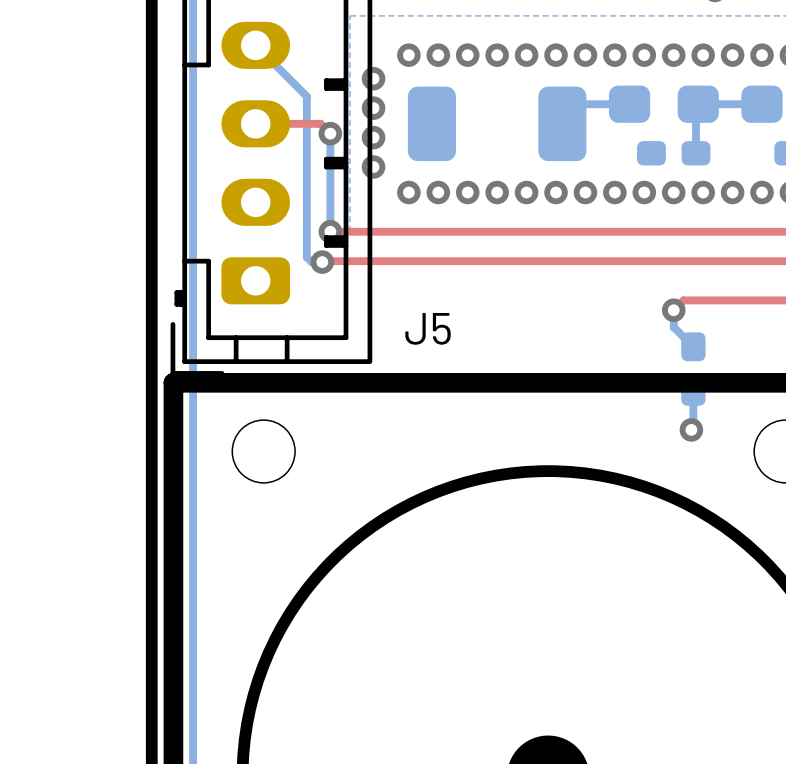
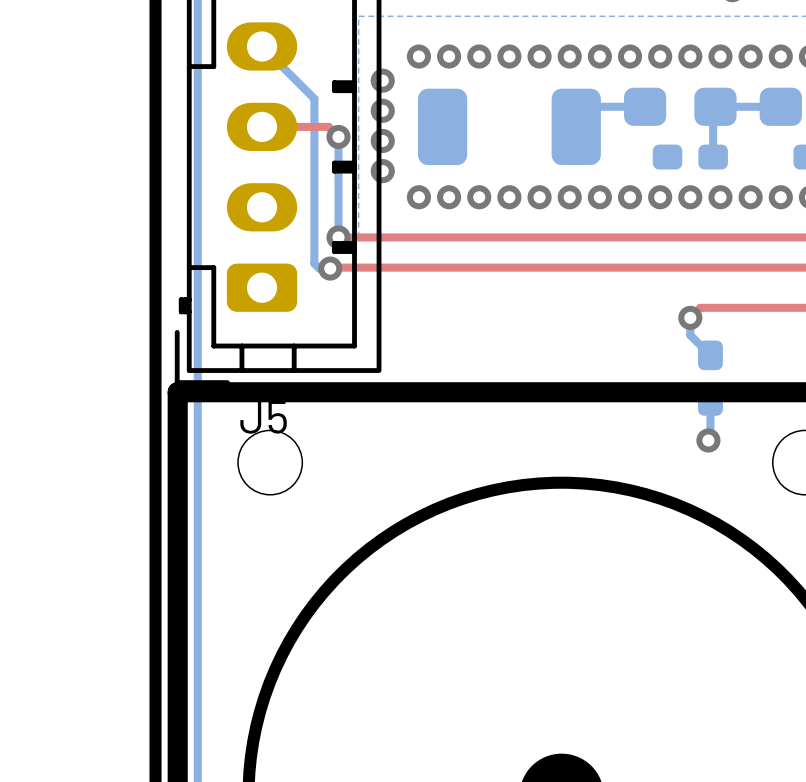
J5 name position: J5 (428, 328) -> J5 (263, 417)

